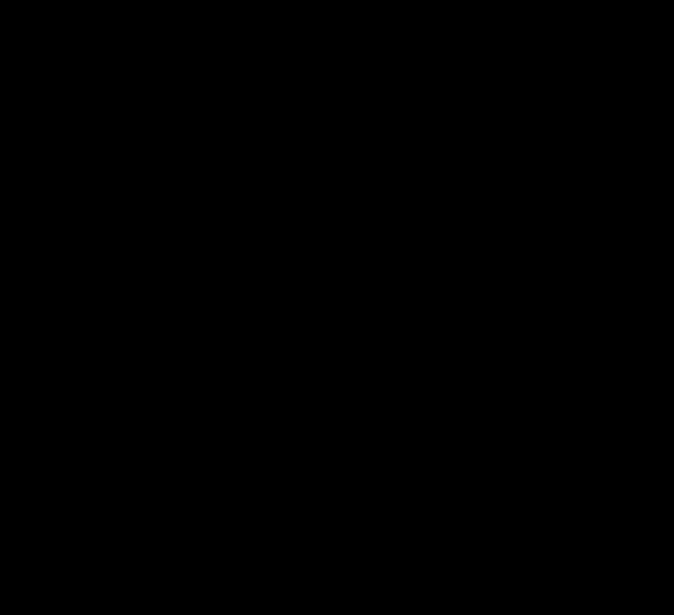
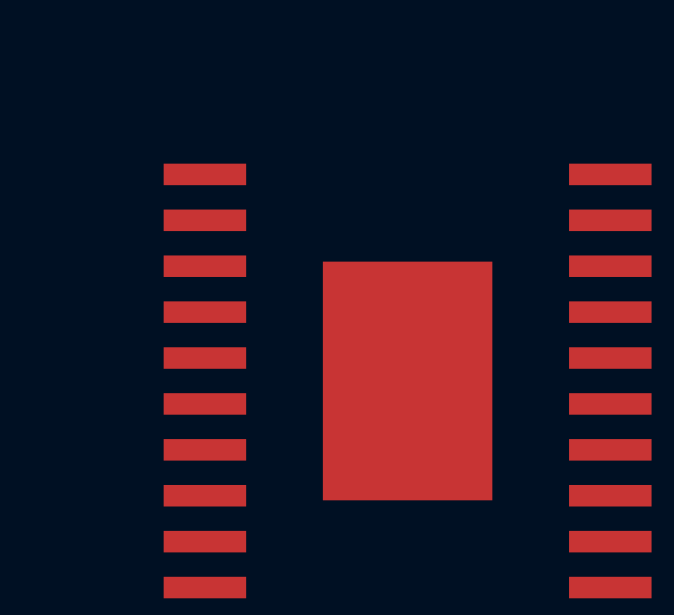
part: none -> (407, 380)

